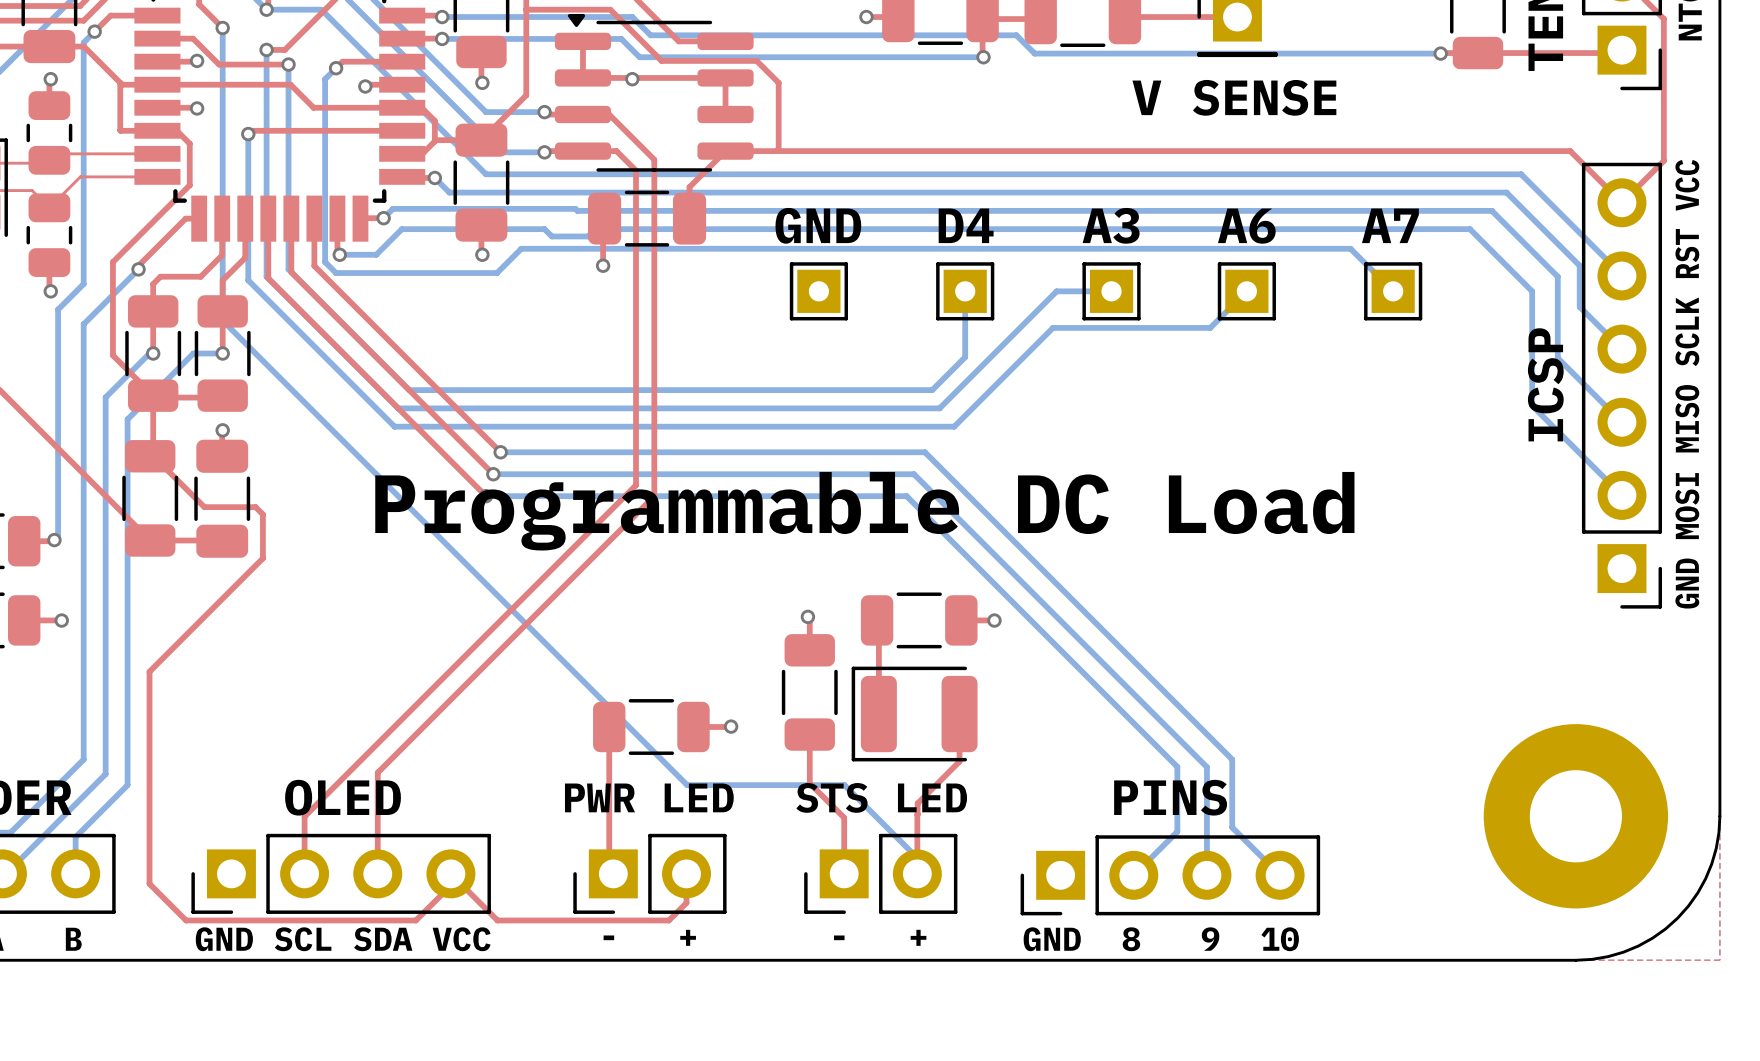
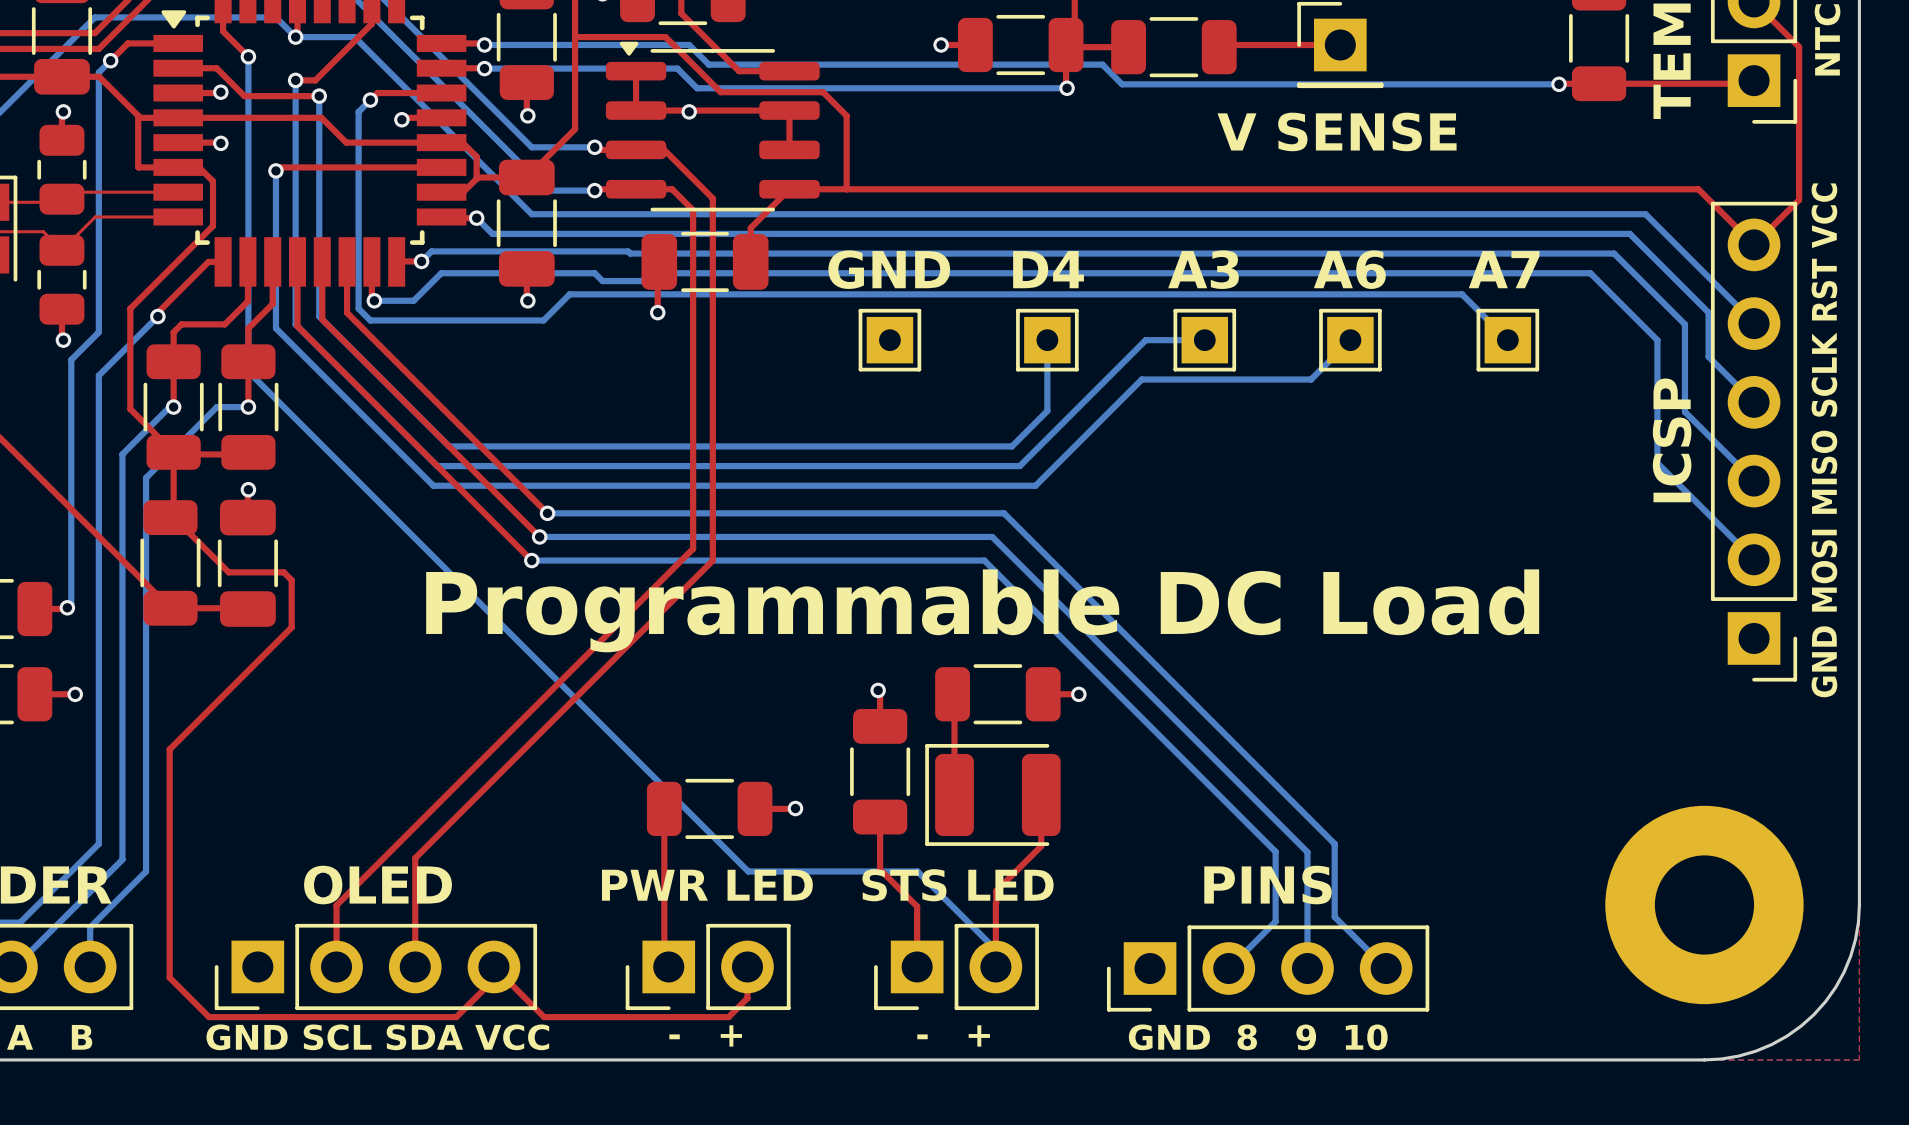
text position: Programmable DC Load (864, 511) -> Programmable DC Load (982, 610)

